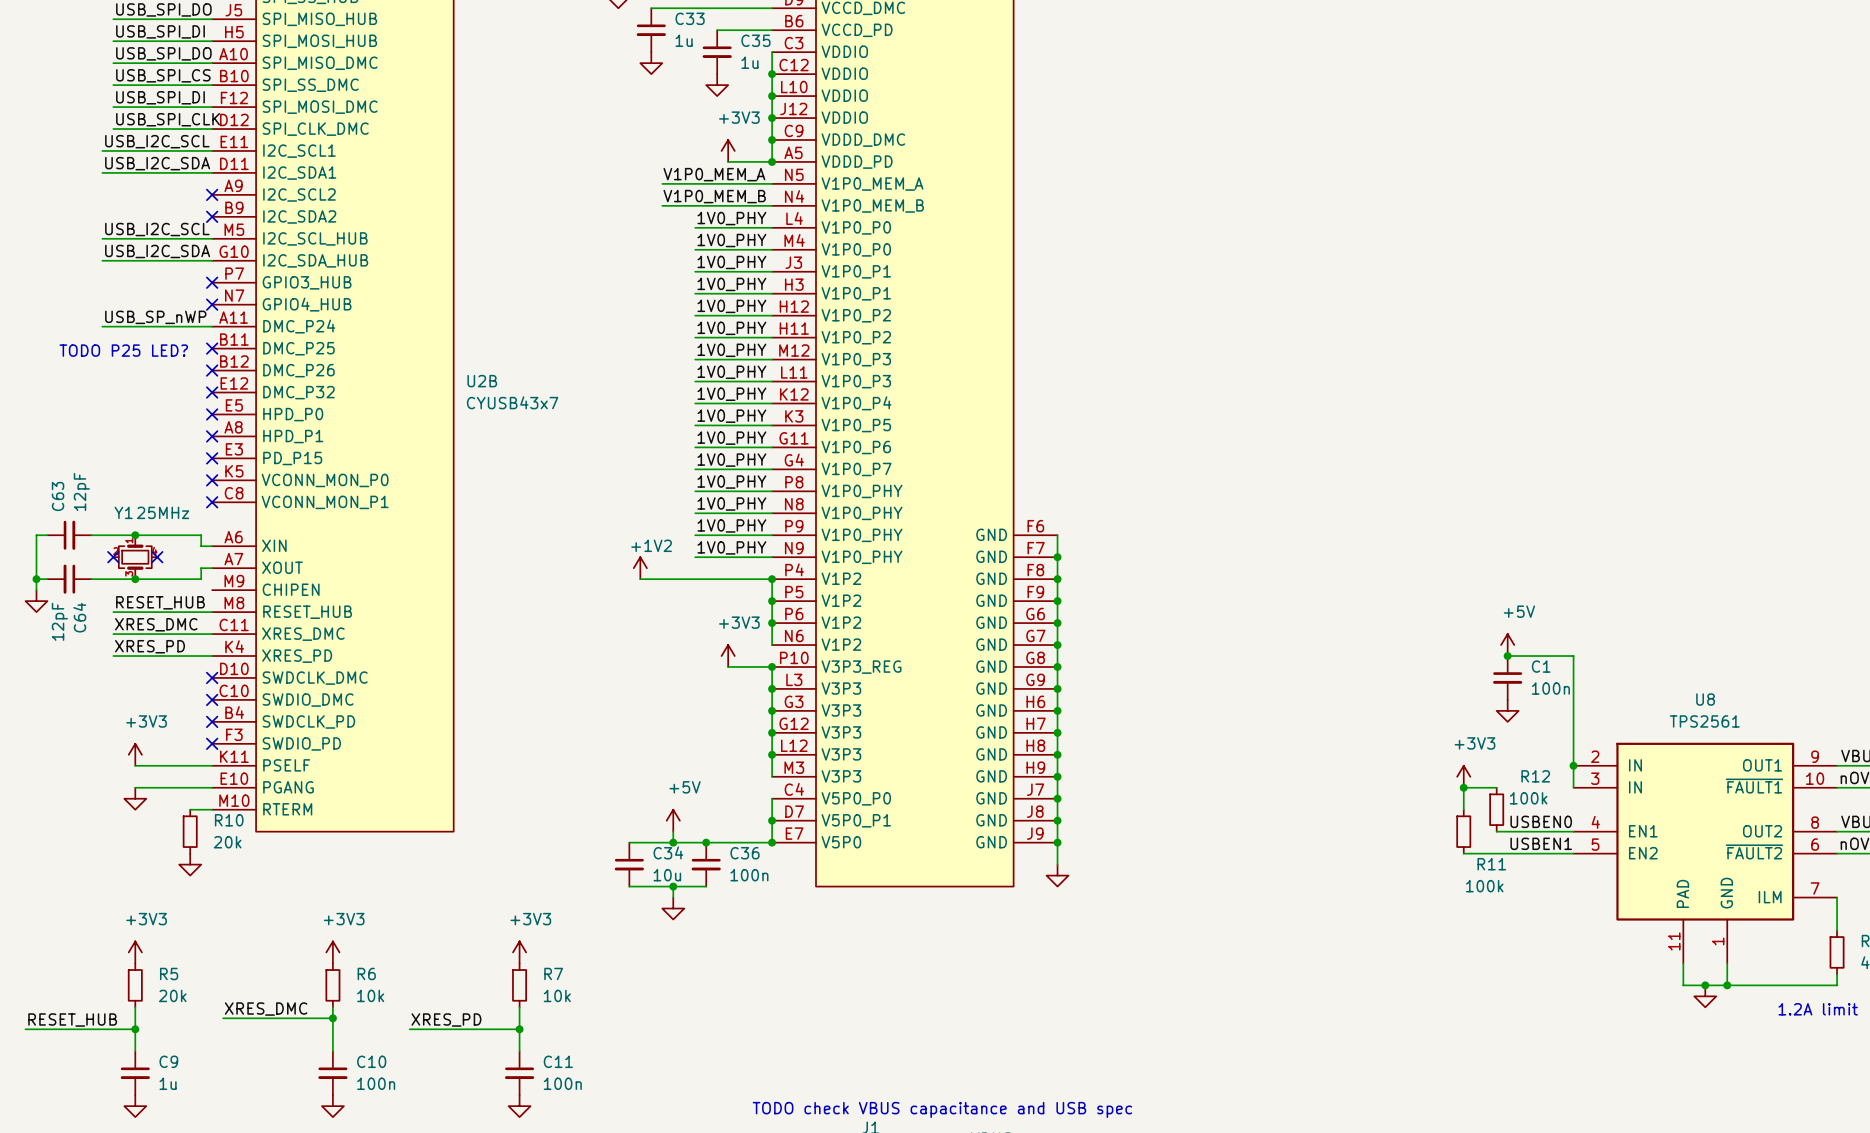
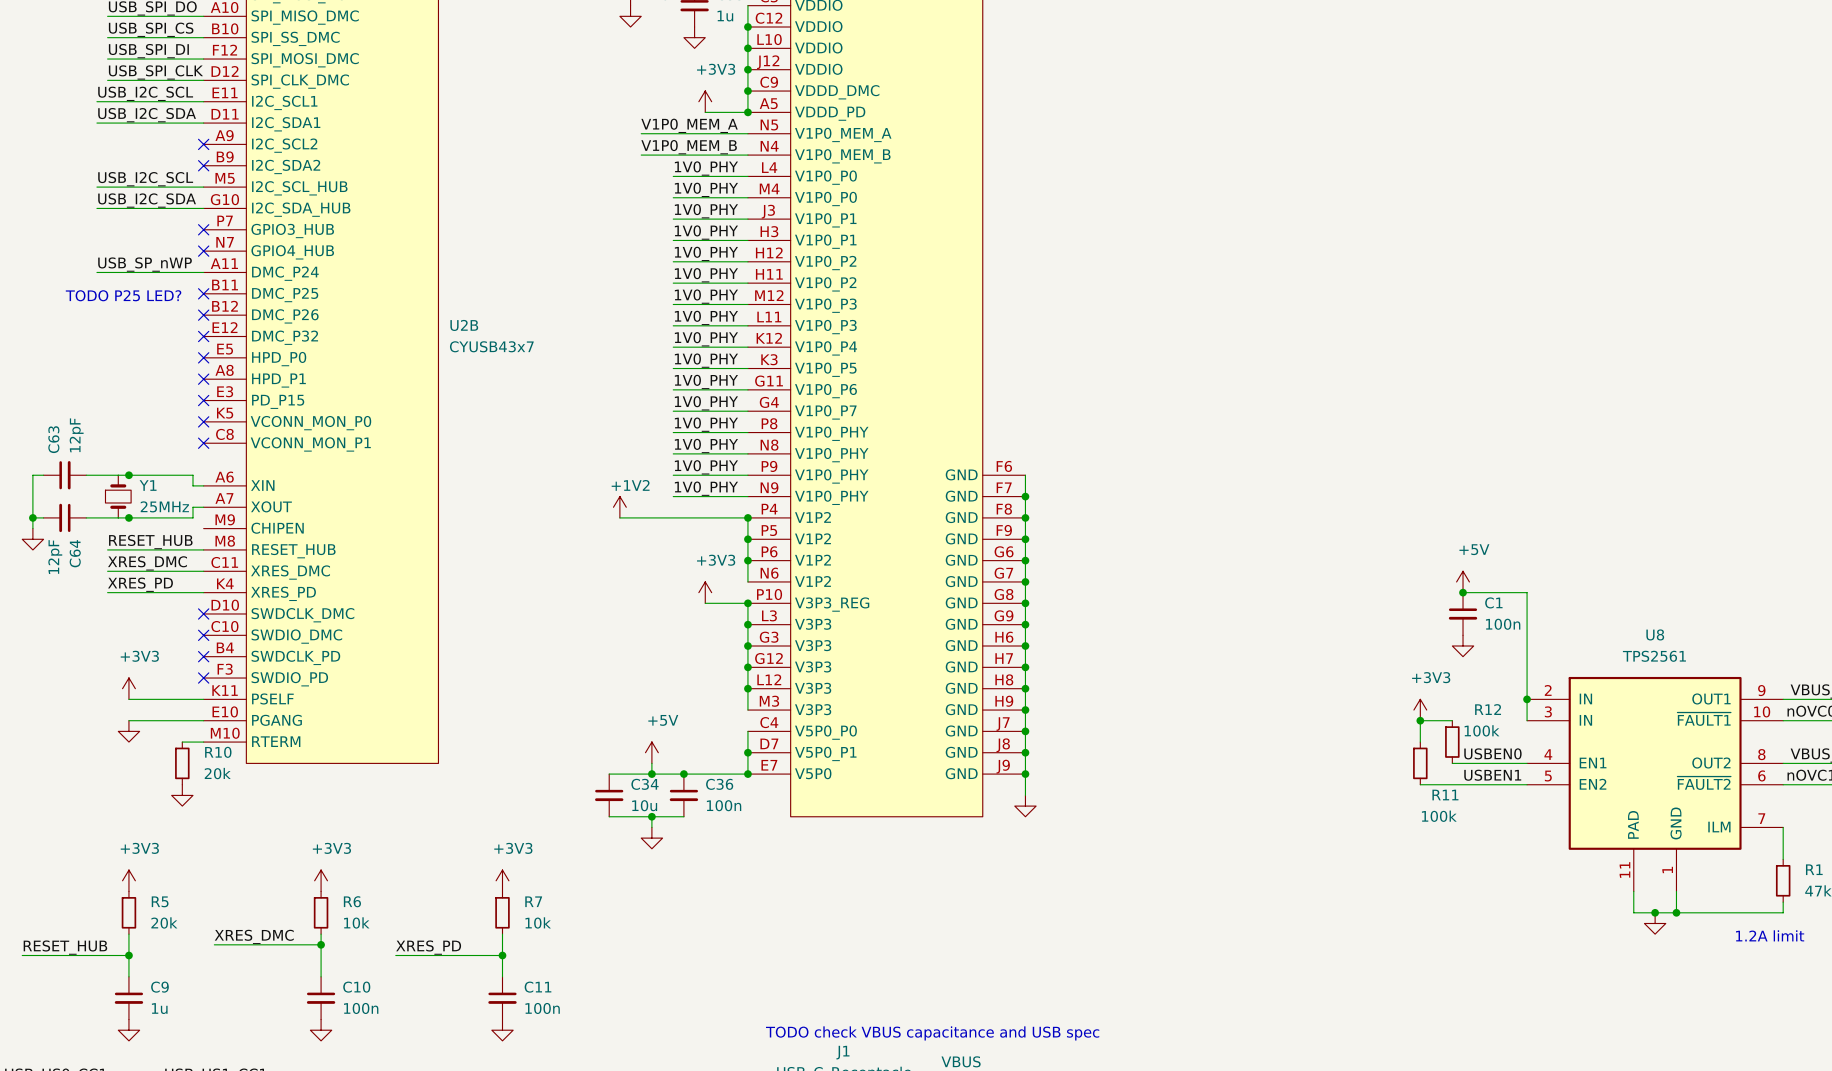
Y1 name position: Y1 (123, 512) -> Y1 (148, 485)
Y1 value position: 25MHz (163, 512) -> 25MHz (164, 506)
Y1 symbol: [113, 535, 158, 580] -> [105, 475, 132, 518]
no-connect mark: (113, 557) -> none
no-connect mark: (157, 557) -> none

